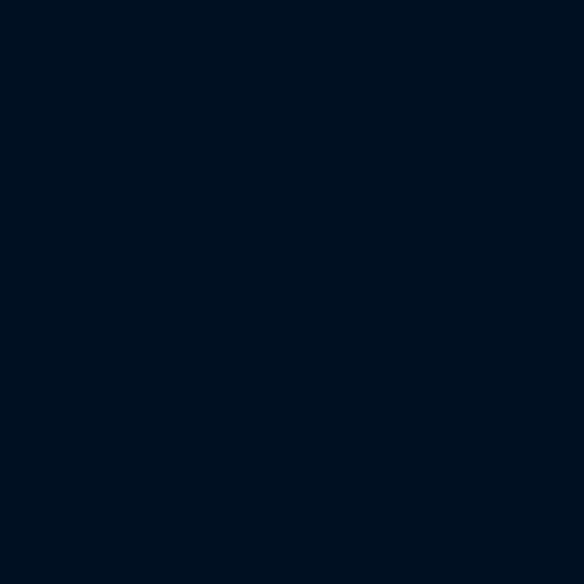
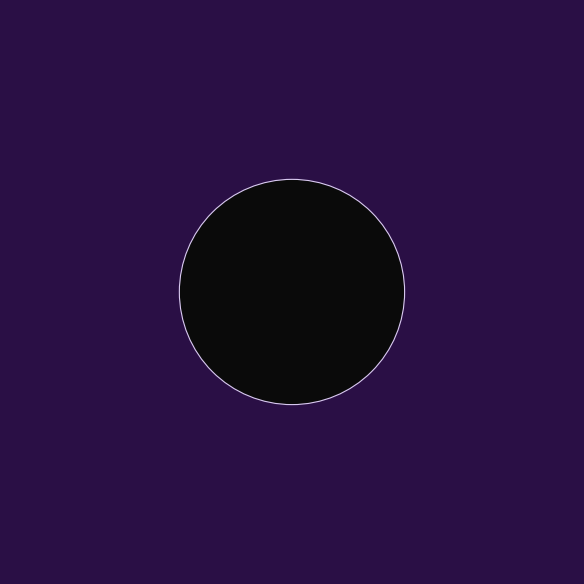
part: none -> (291, 291)

